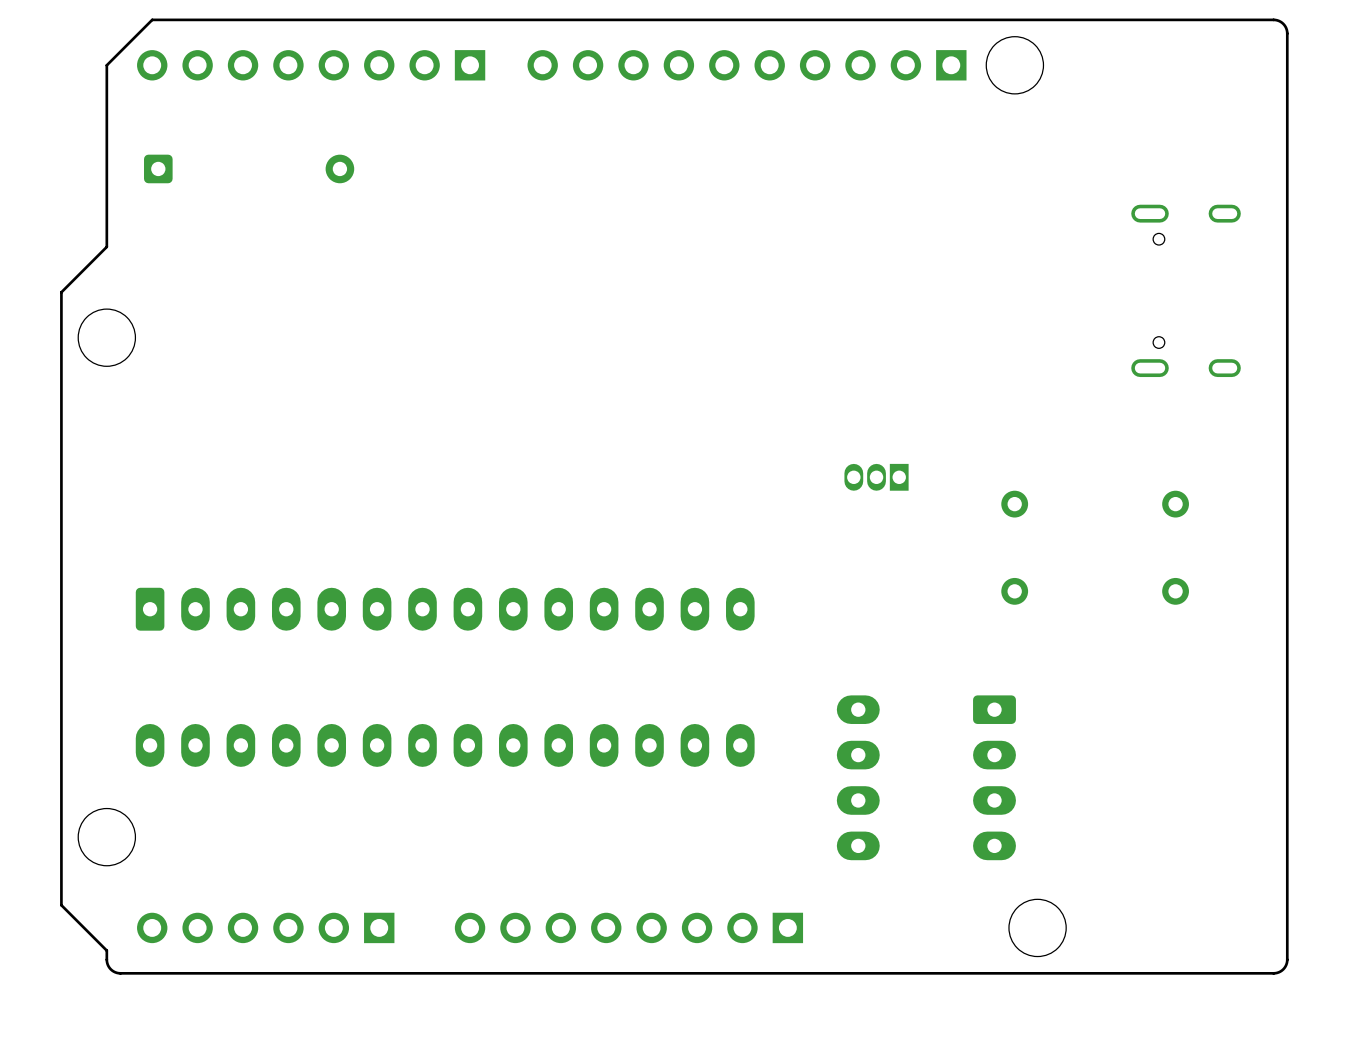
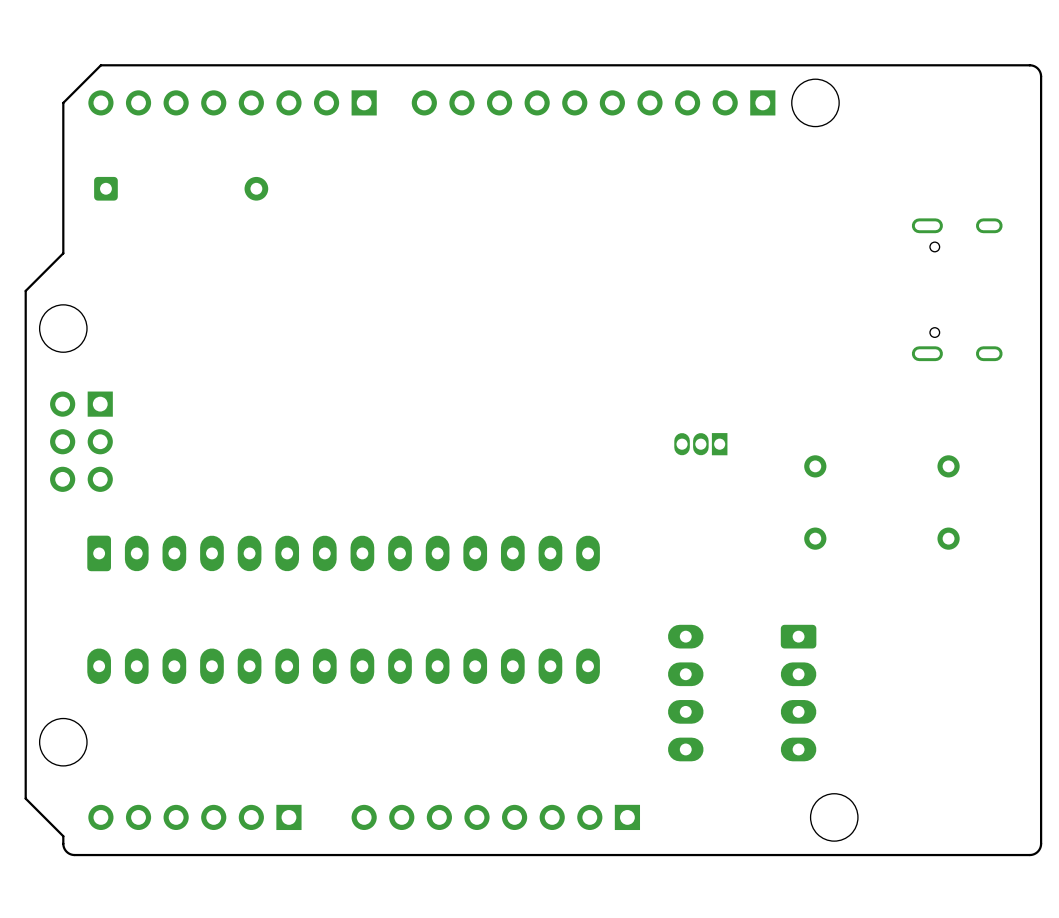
part: none -> (81, 441)

